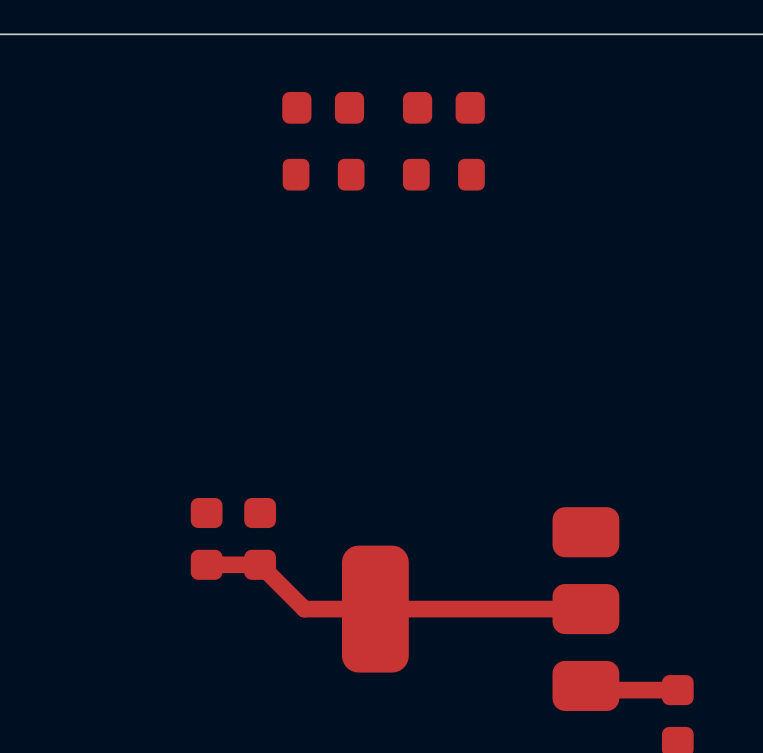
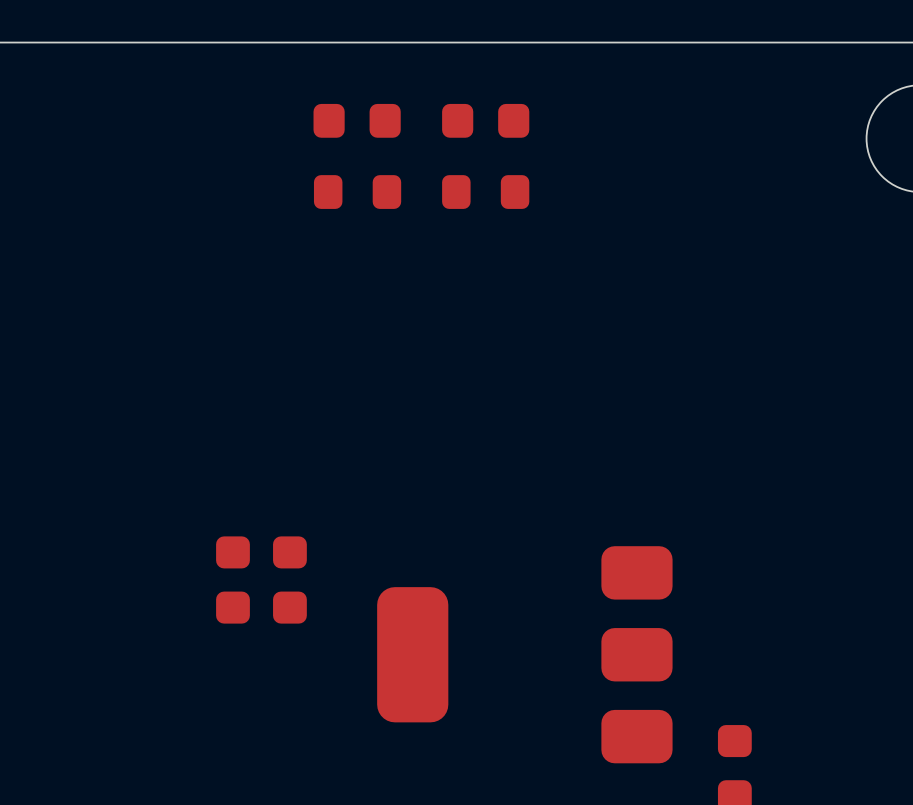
top track: (206, 564) (260, 564) (304, 609) (585, 609) -> none
top track: (585, 685) (590, 690) (677, 690) -> none

